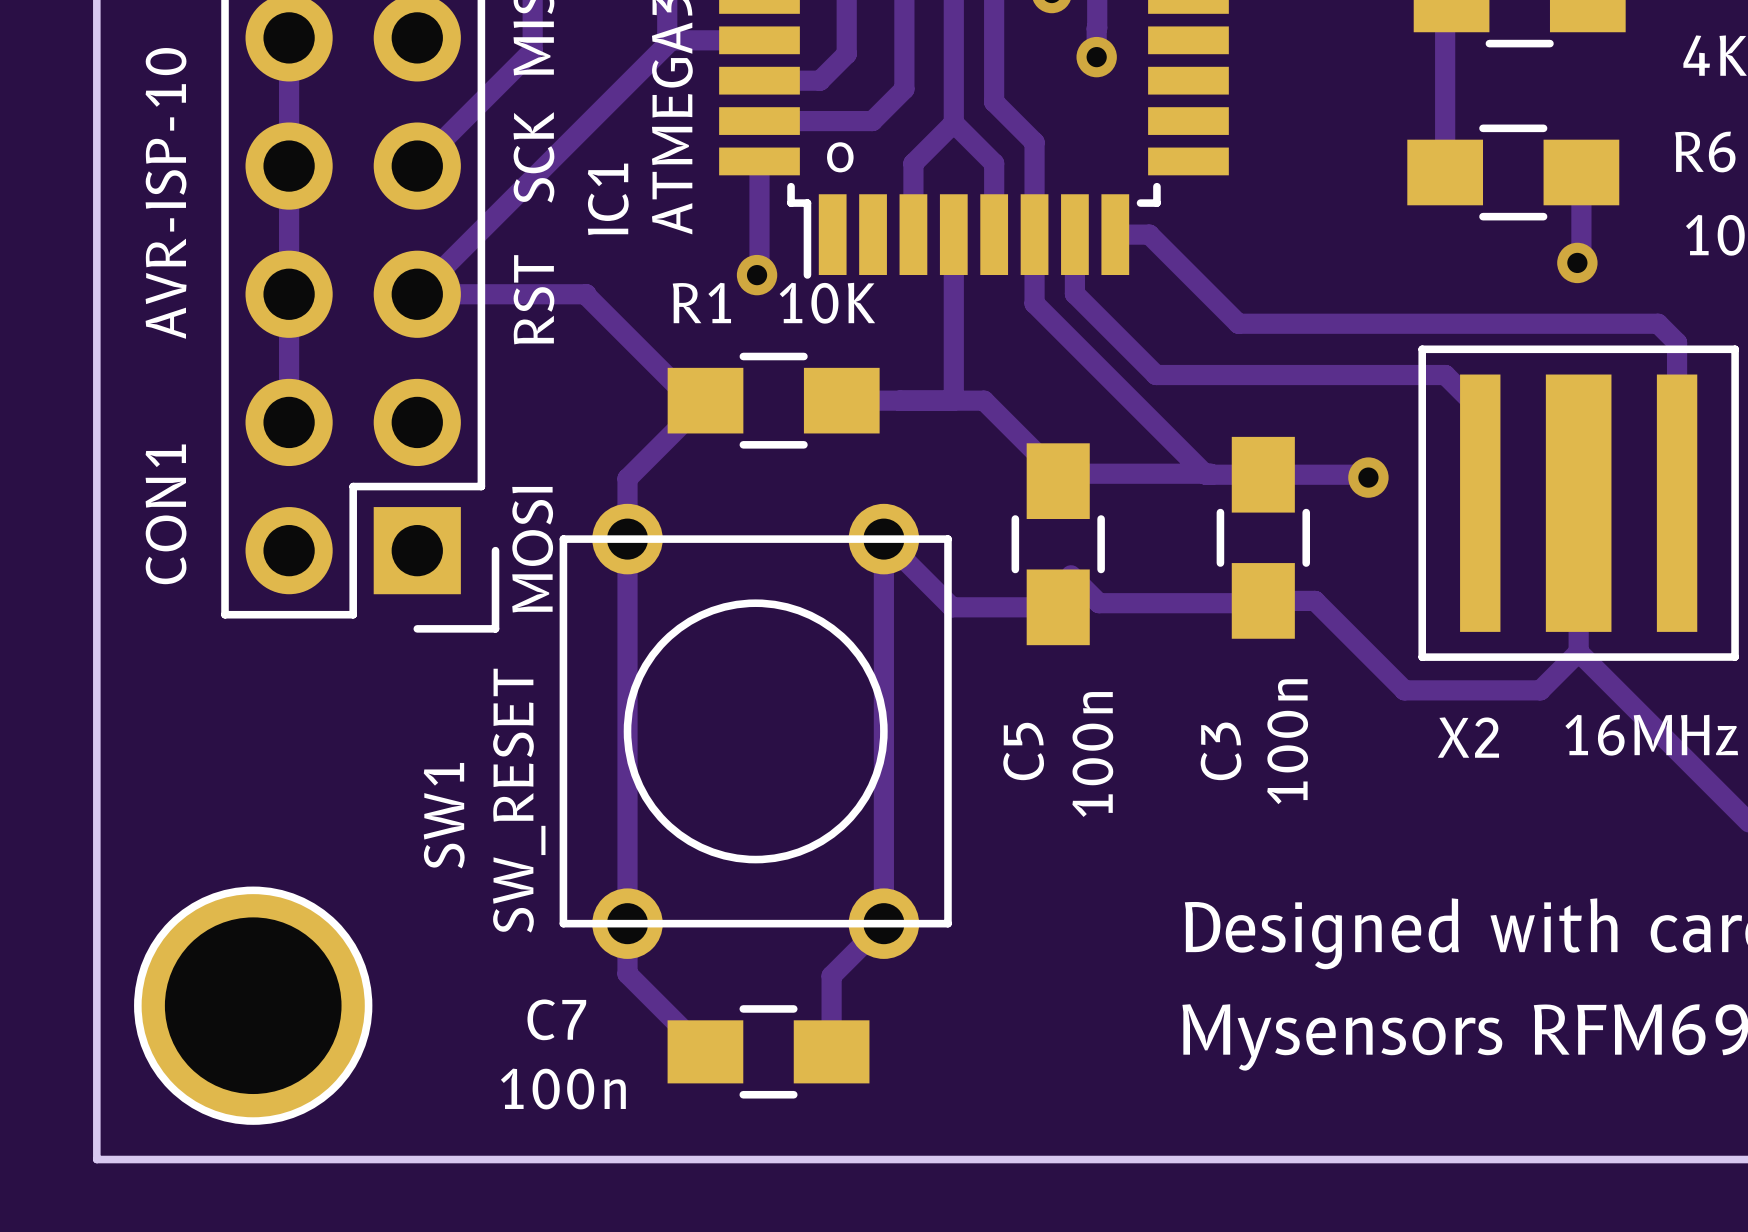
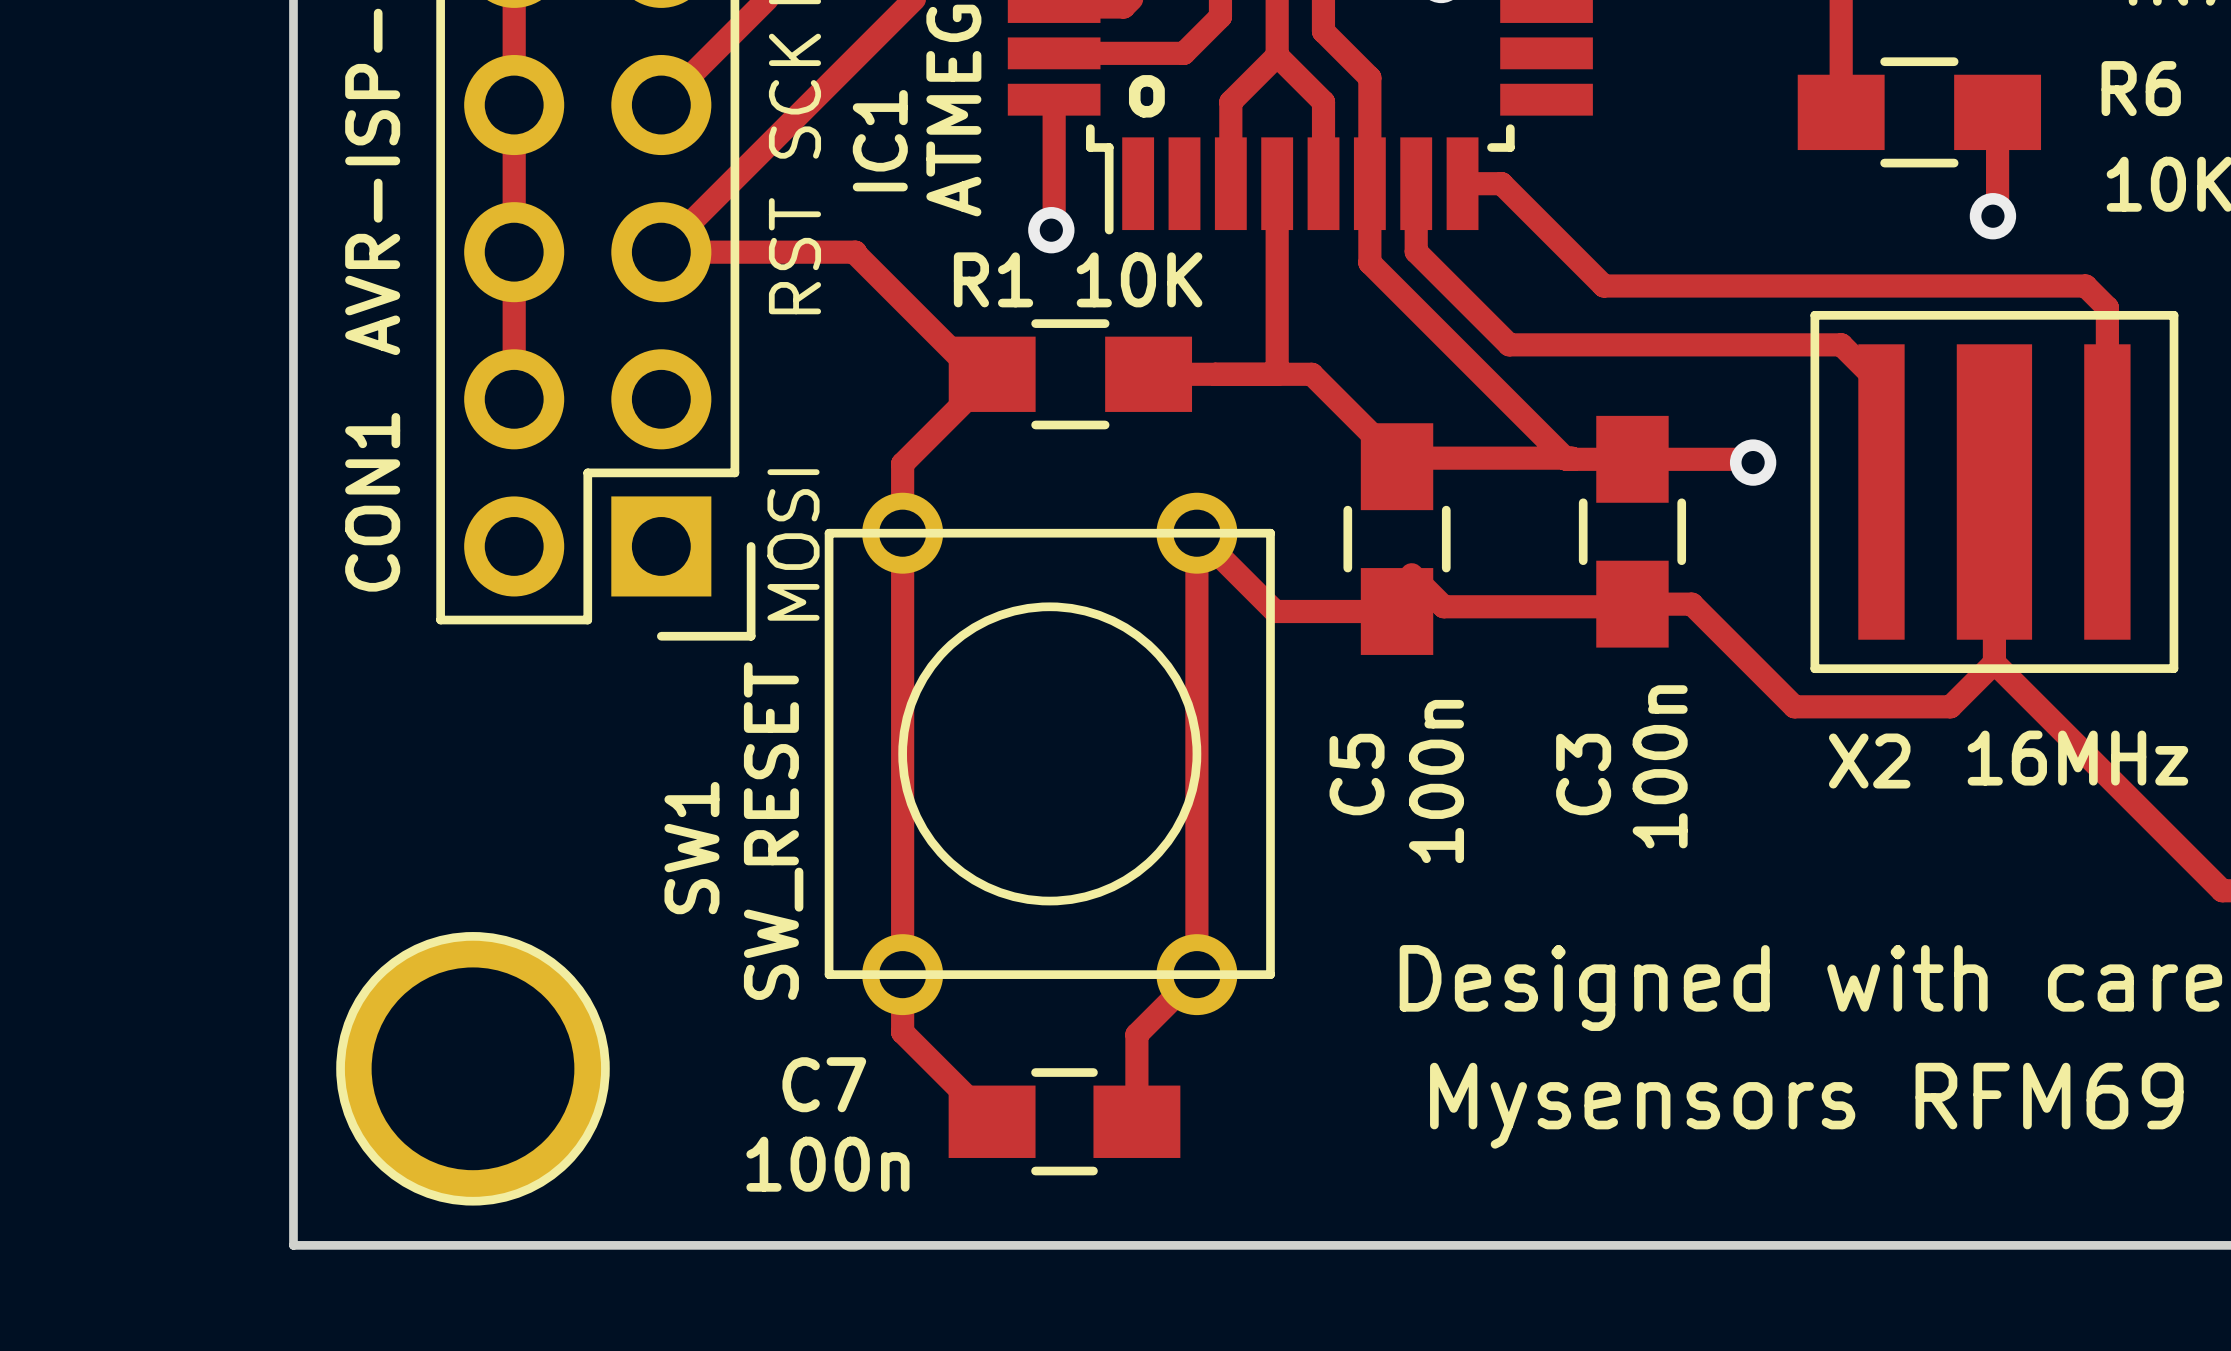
R1 name position: R1 (701, 303) -> R1 (993, 279)
R1 value position: 10K (827, 303) -> 10K (1139, 279)

